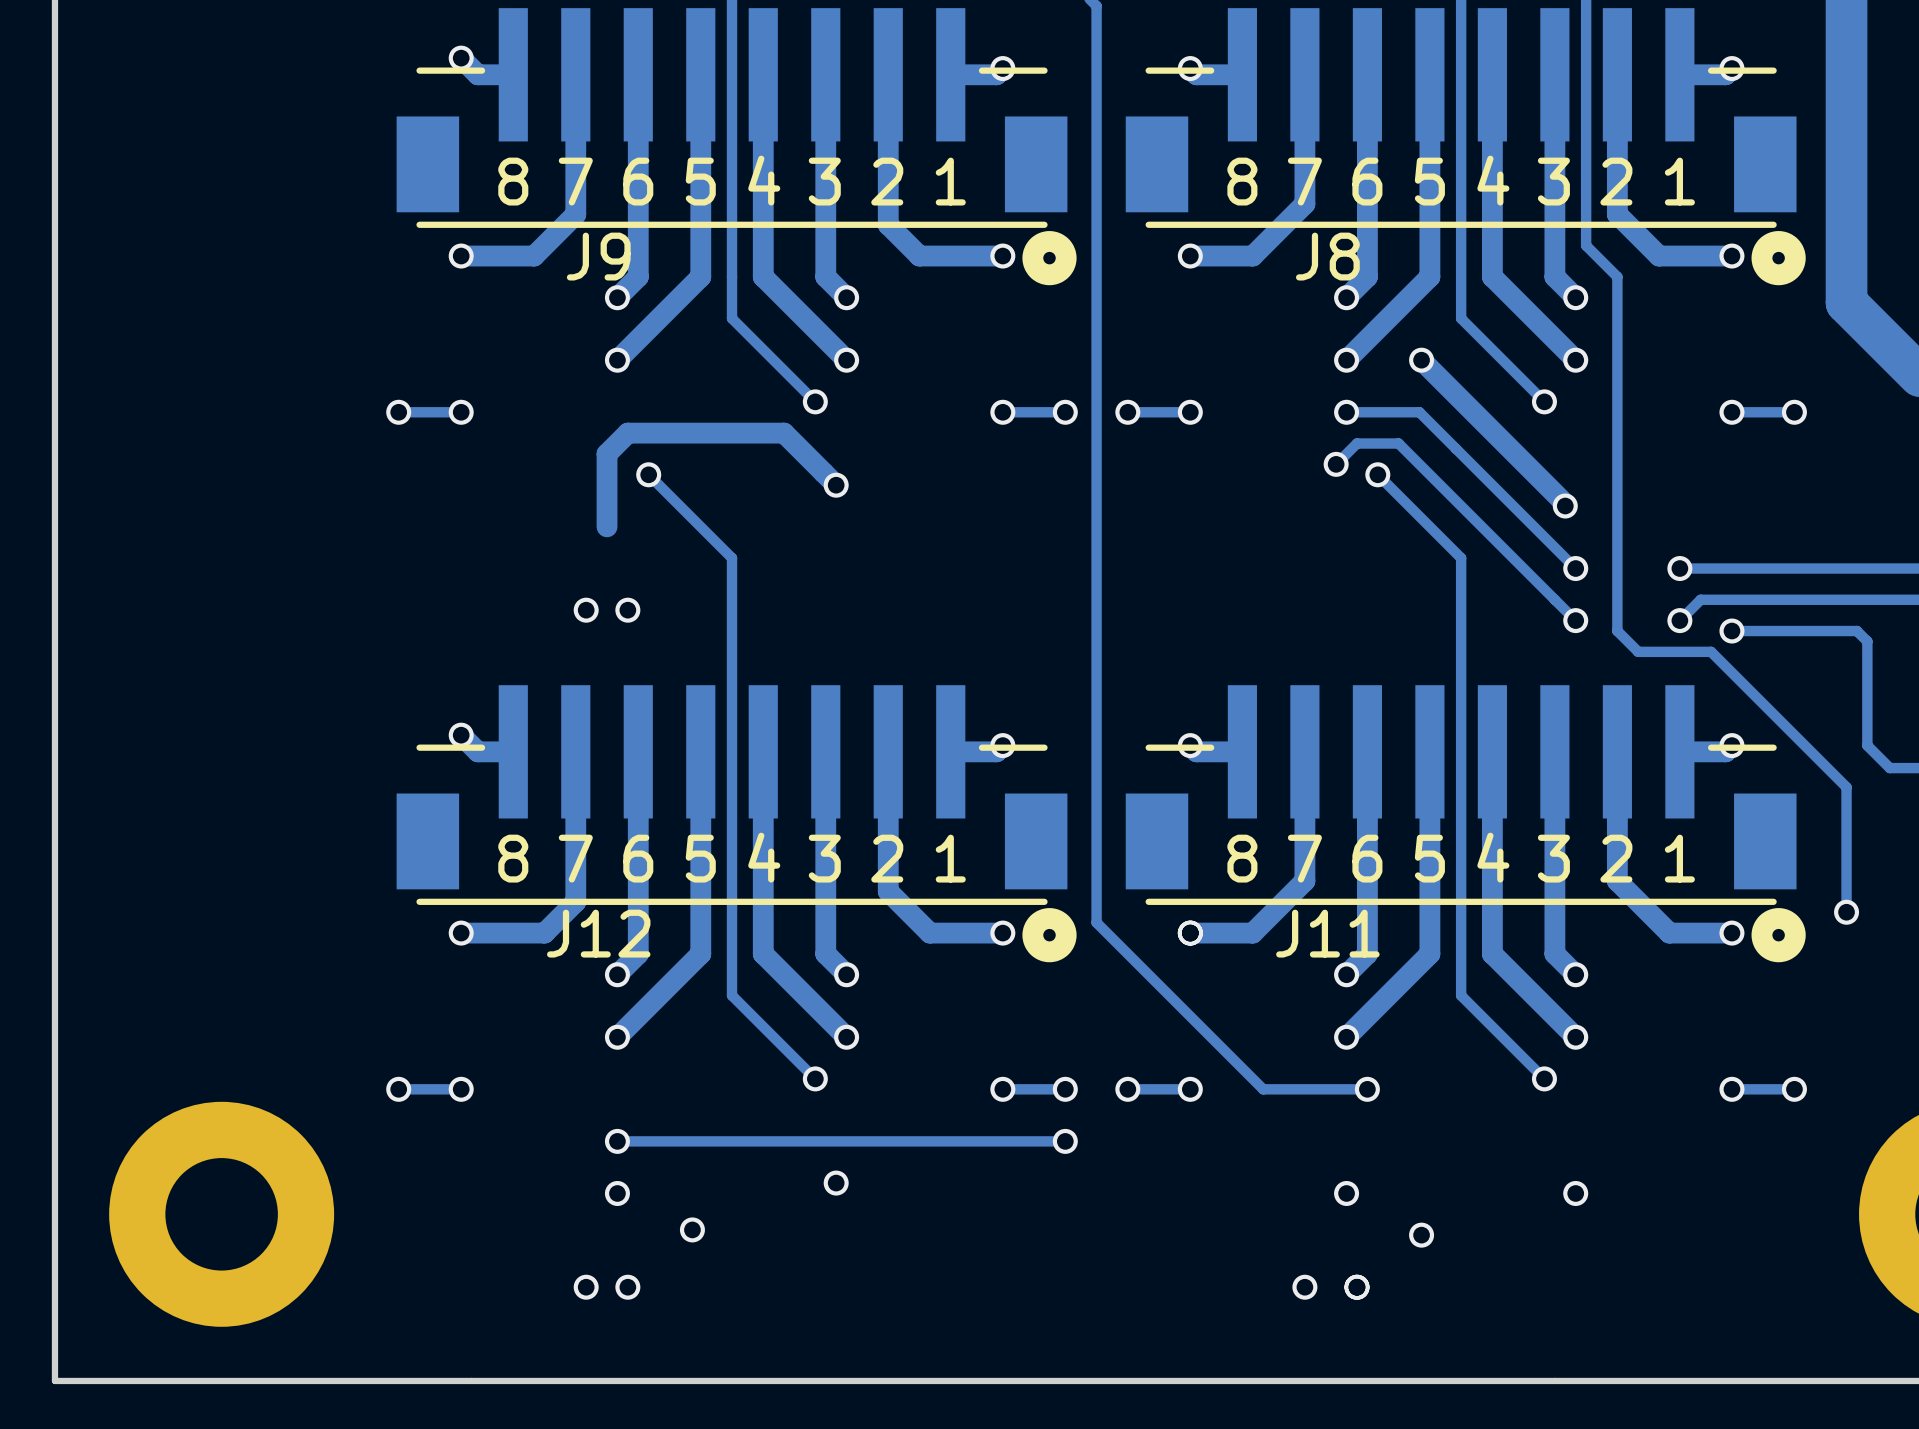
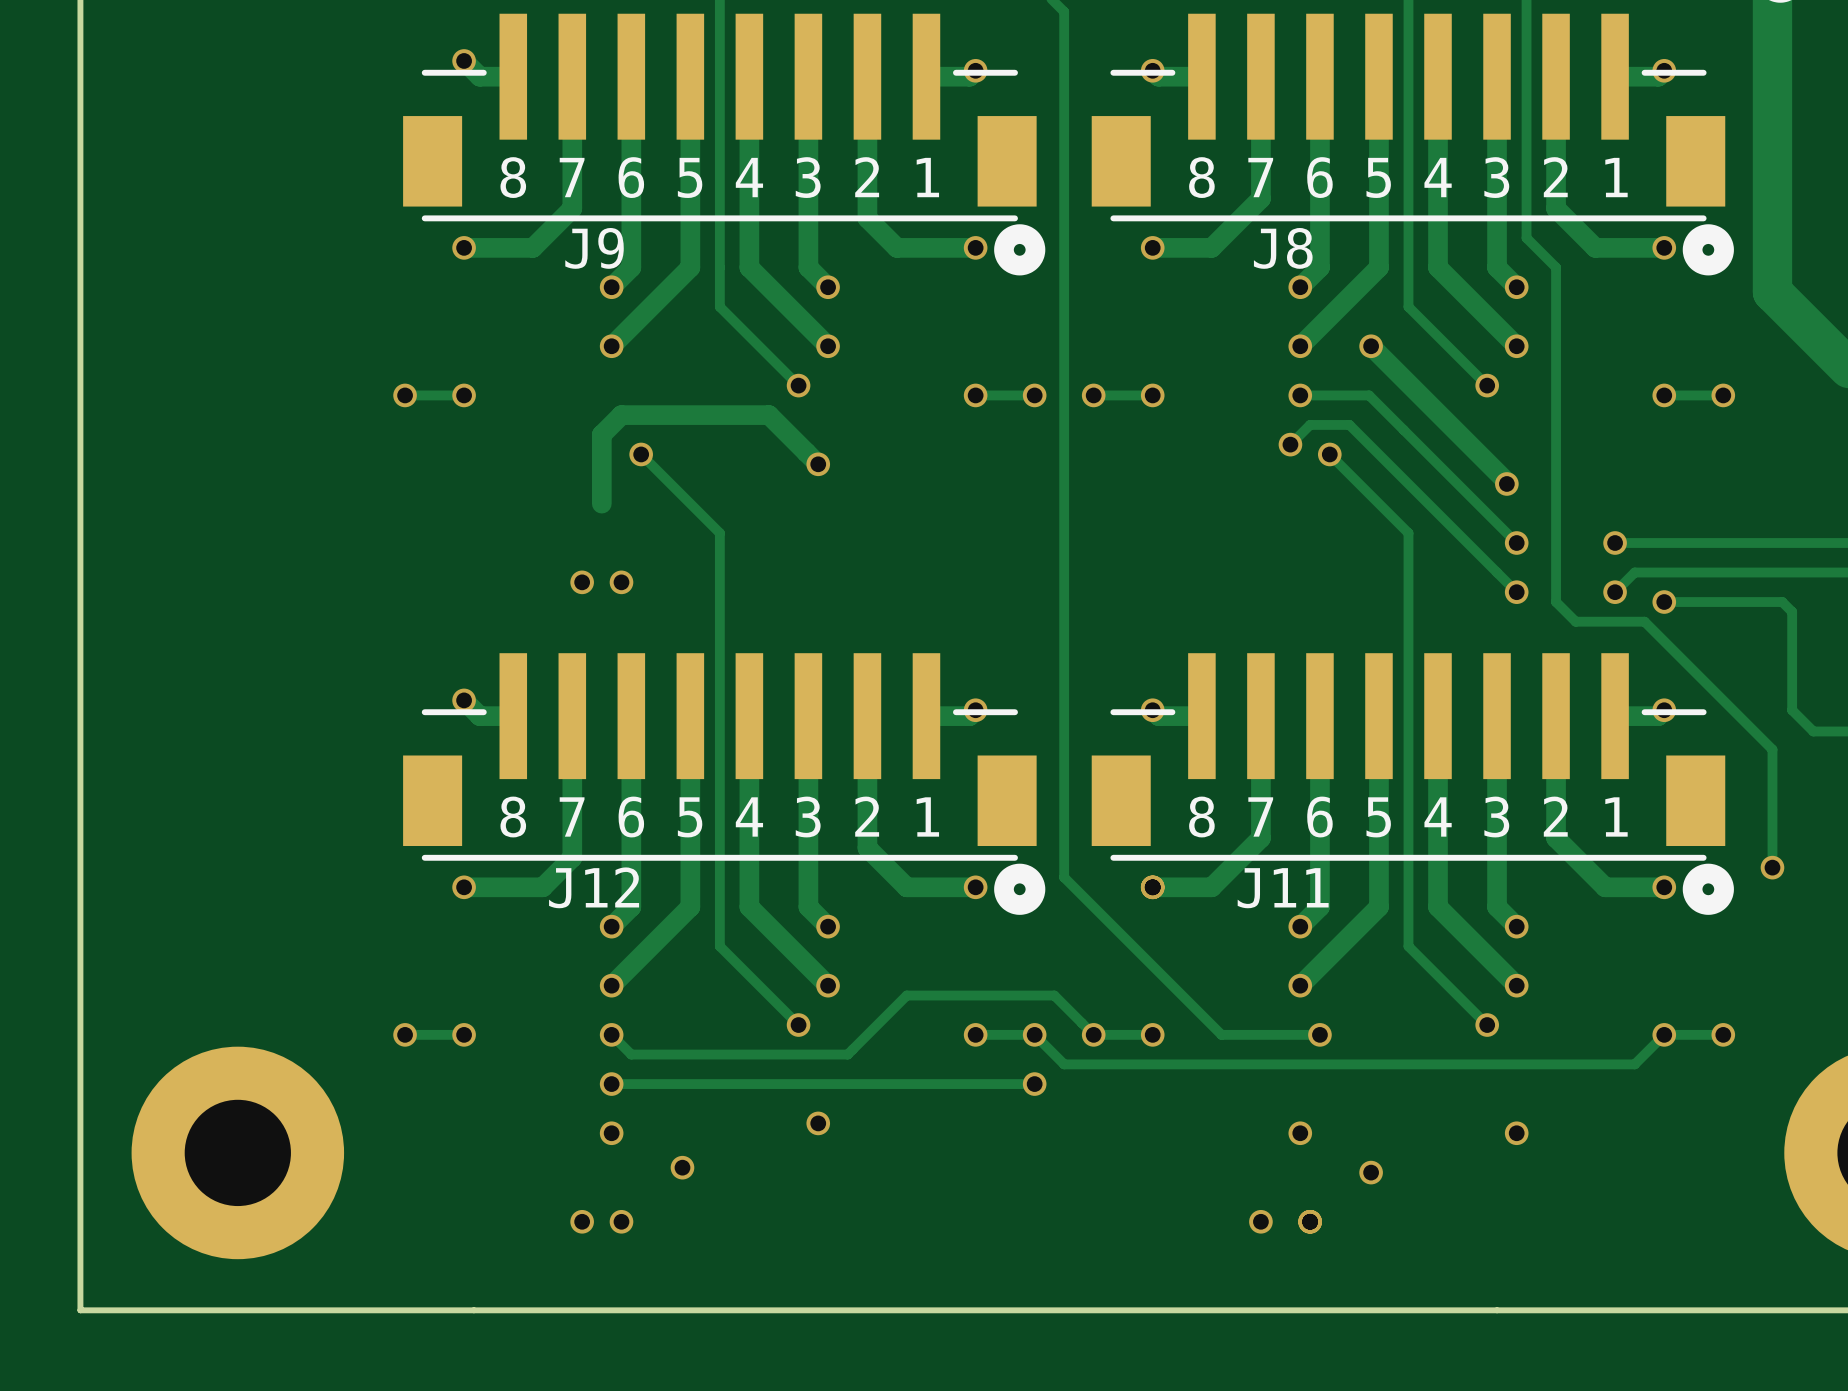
via: none -> (611, 1034)
track: none -> (1093, 1034) (1054, 995) (906, 995) (847, 1054) (631, 1054) (611, 1034)
track: none -> (1664, 1034) (1634, 1064) (1064, 1064) (1034, 1034)

